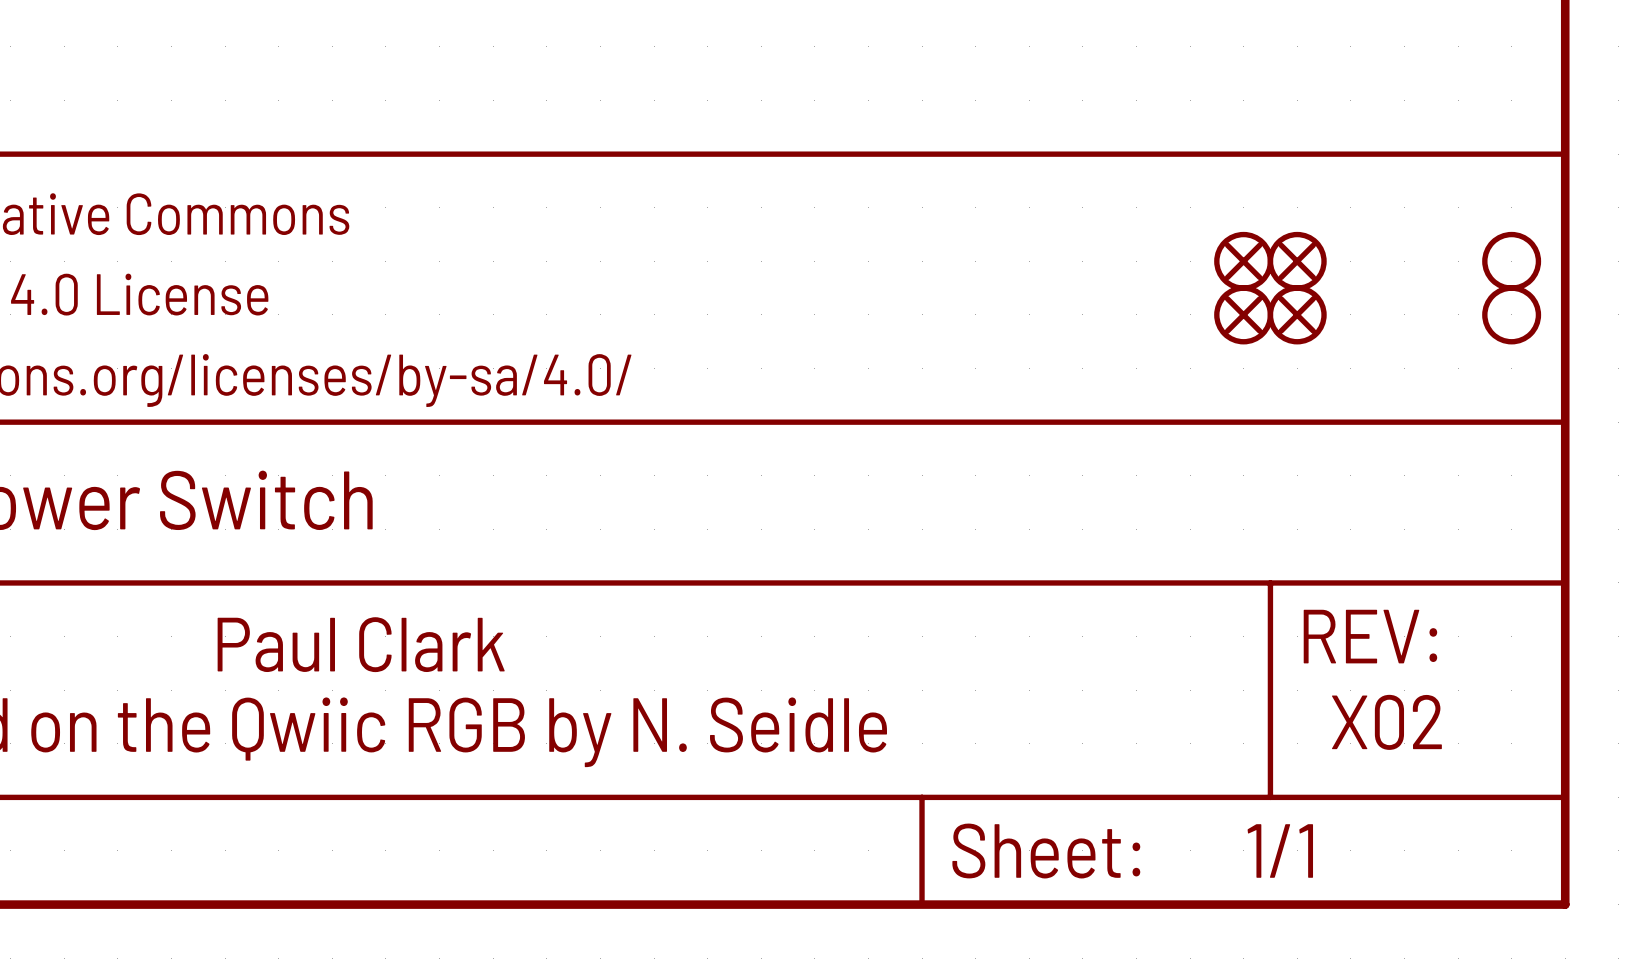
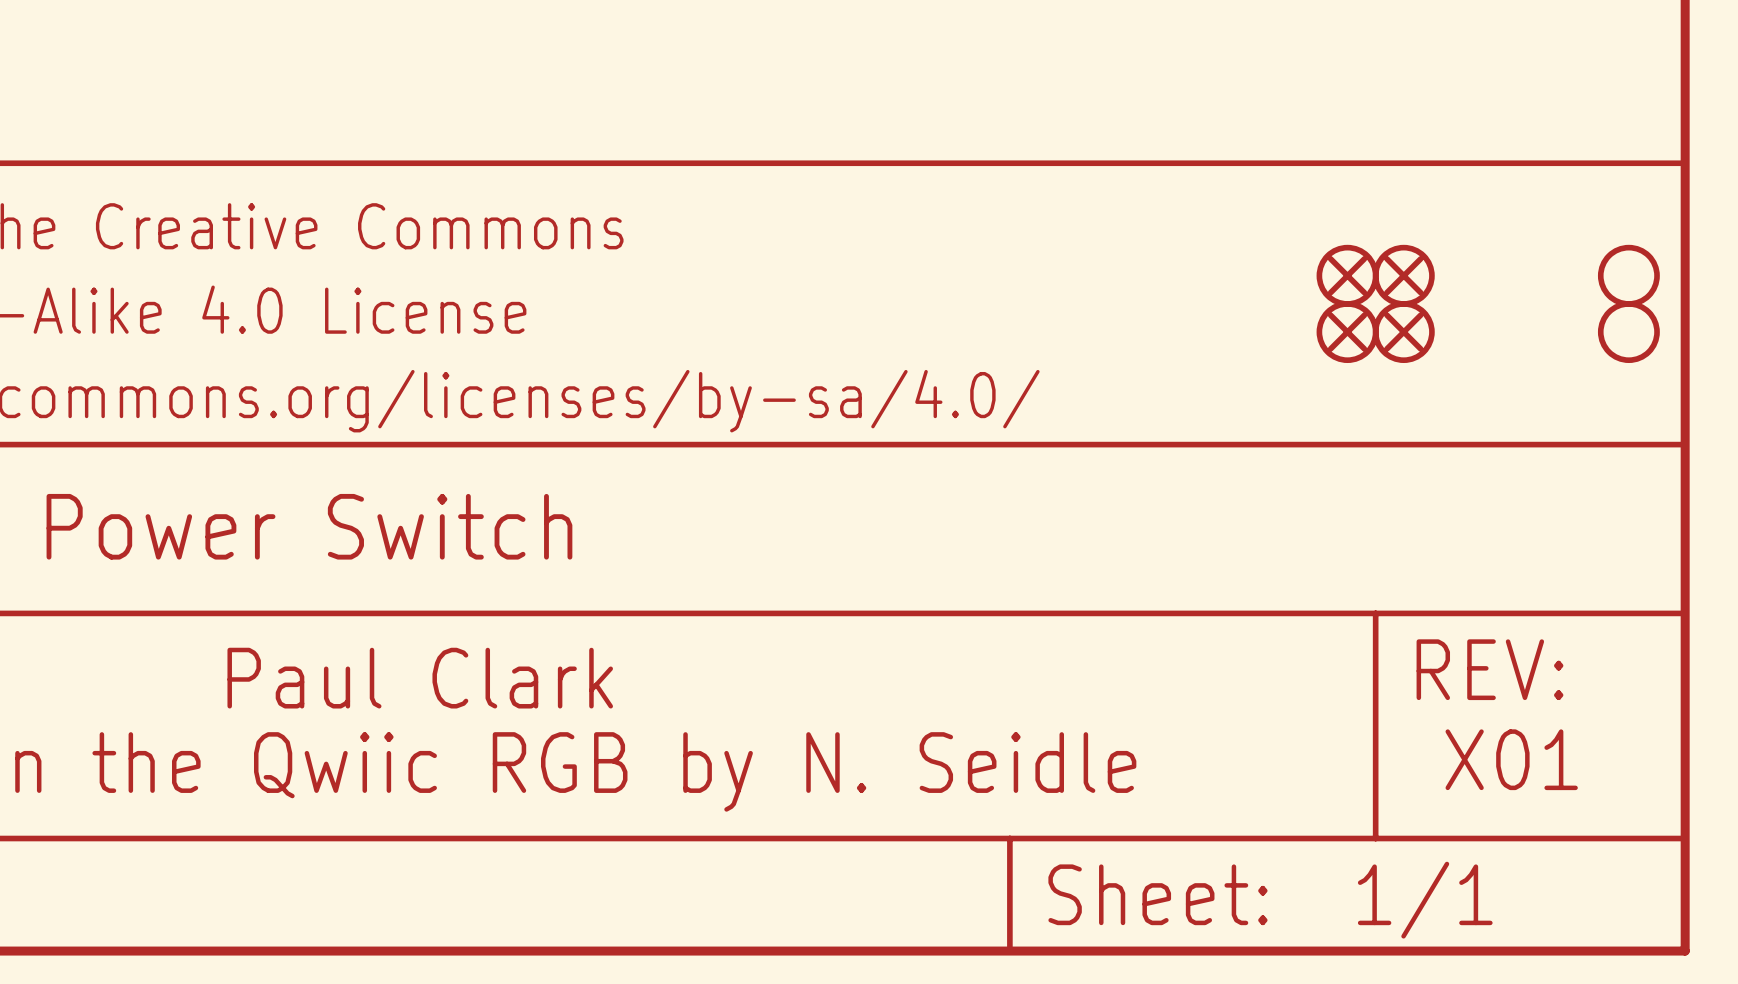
text: X02 (1386, 722) -> X01 (1511, 759)

